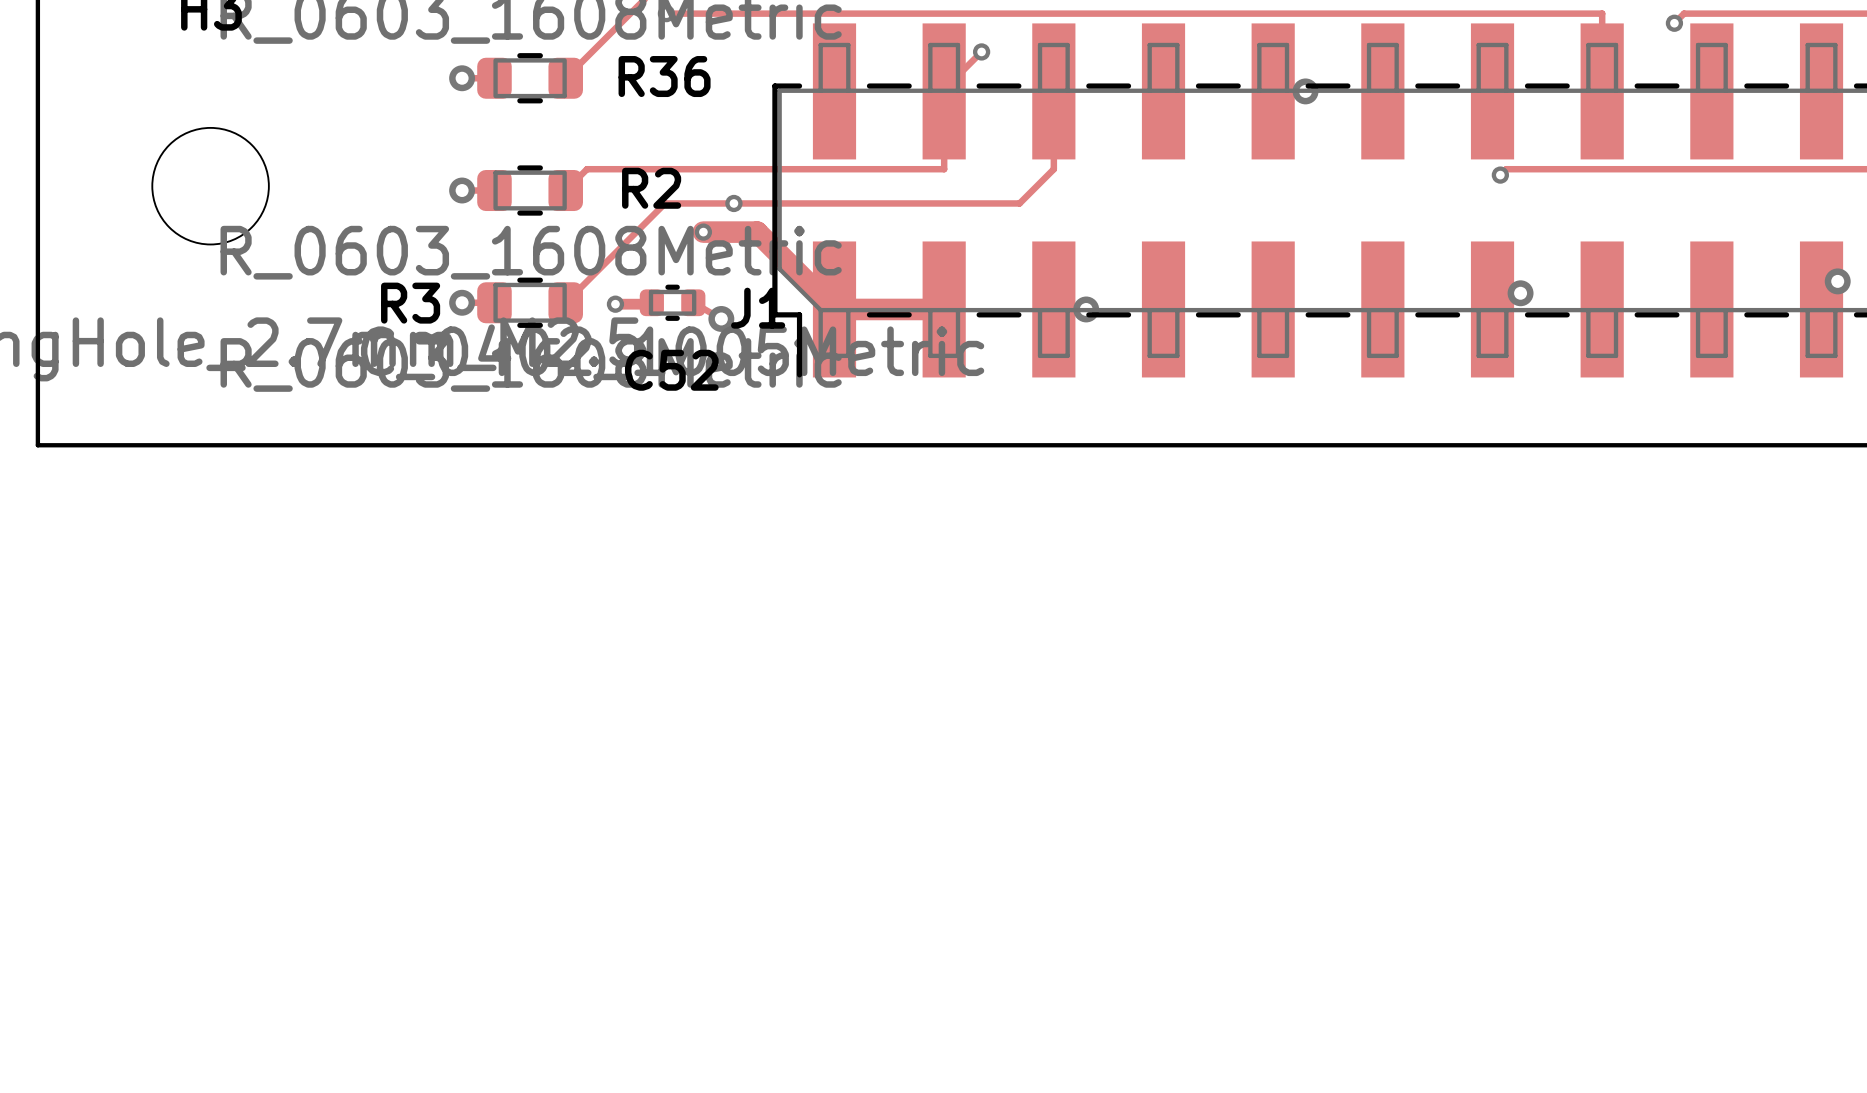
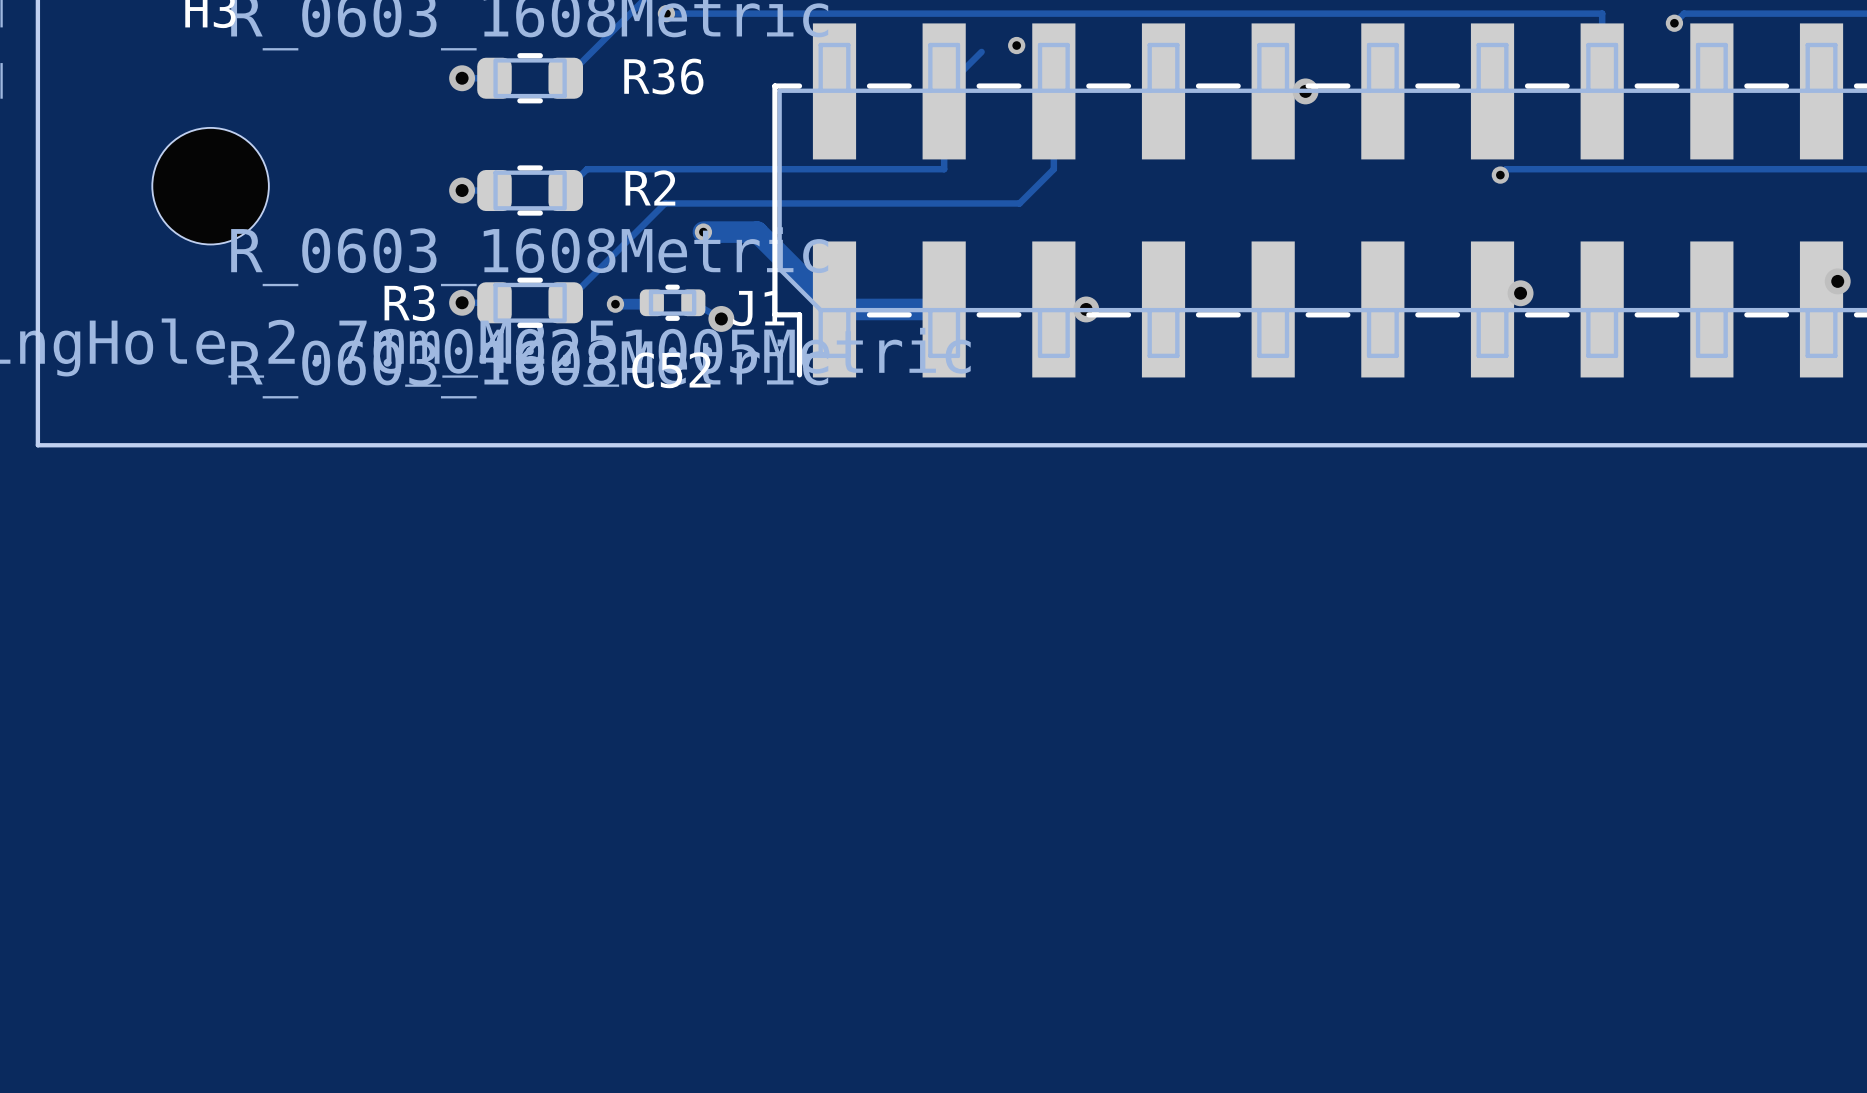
via position: (981, 51) -> (1016, 45)
via: (733, 203) -> none

